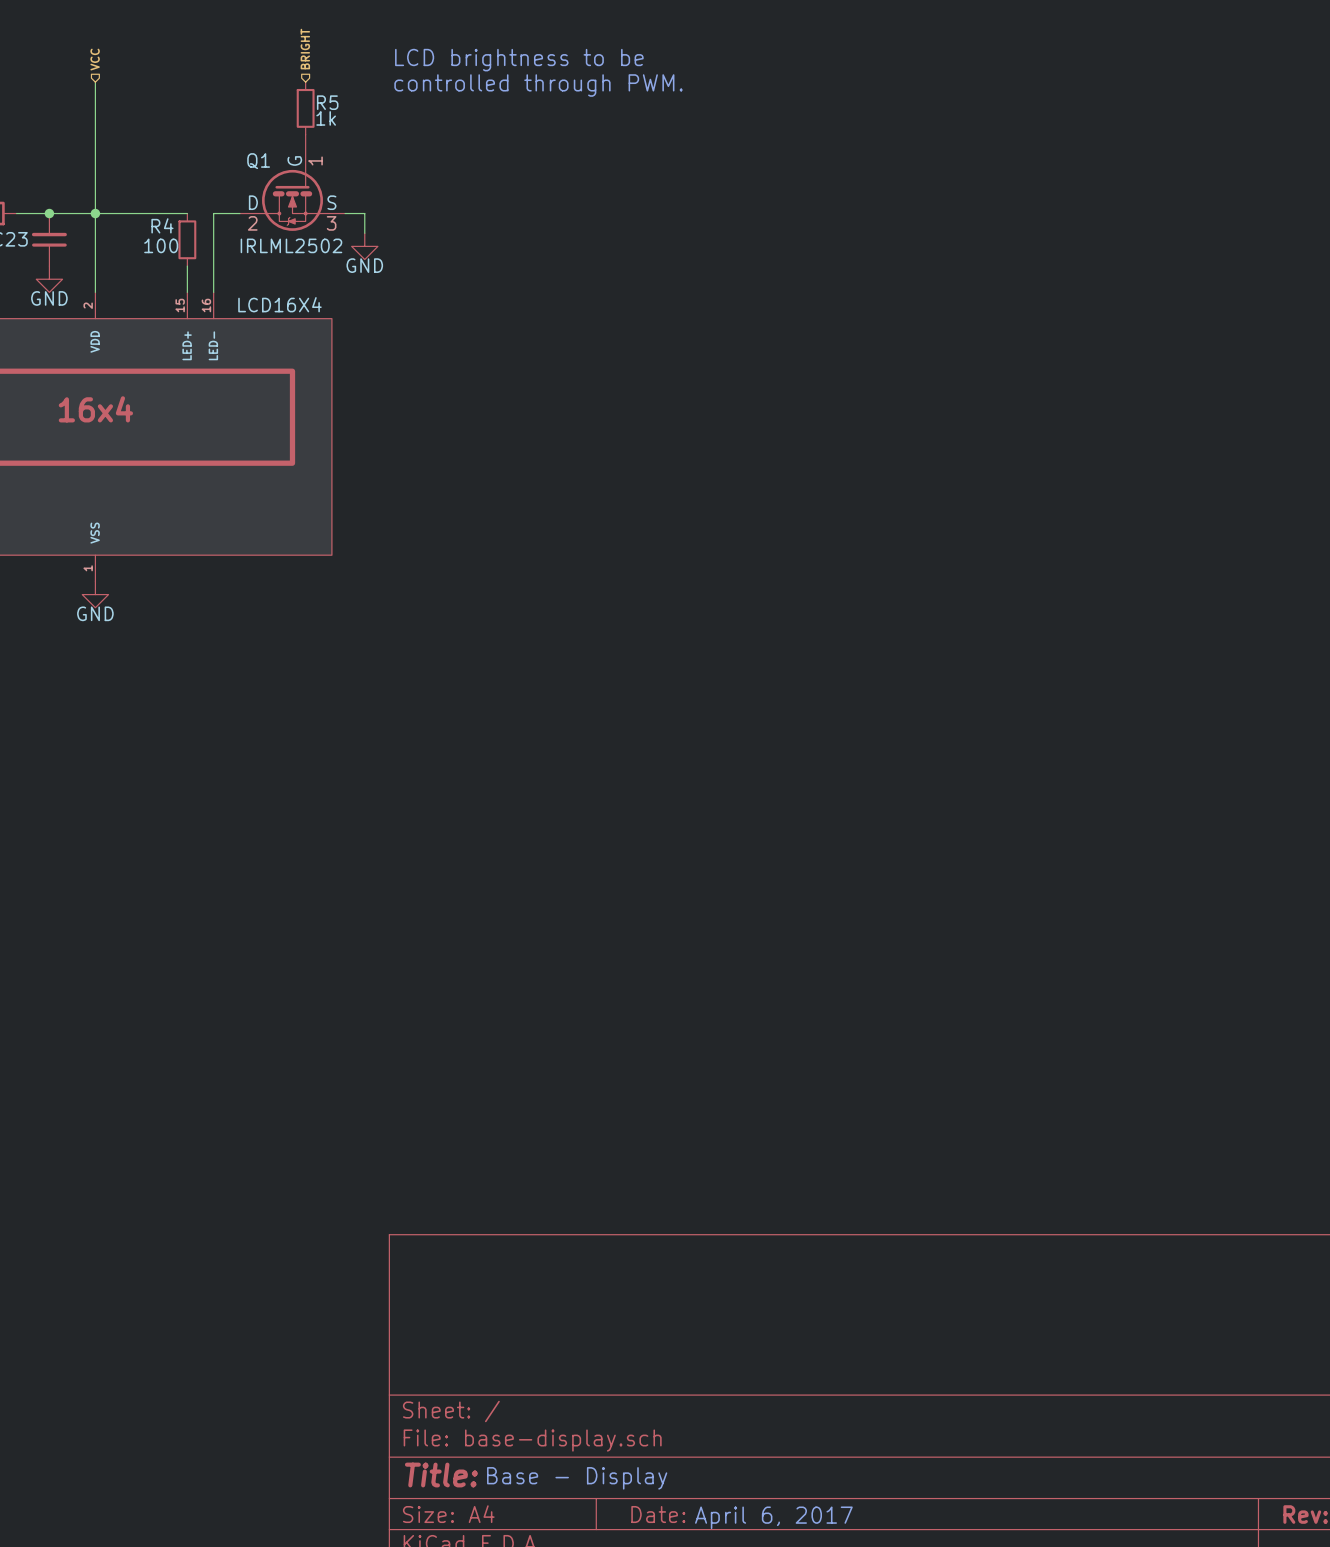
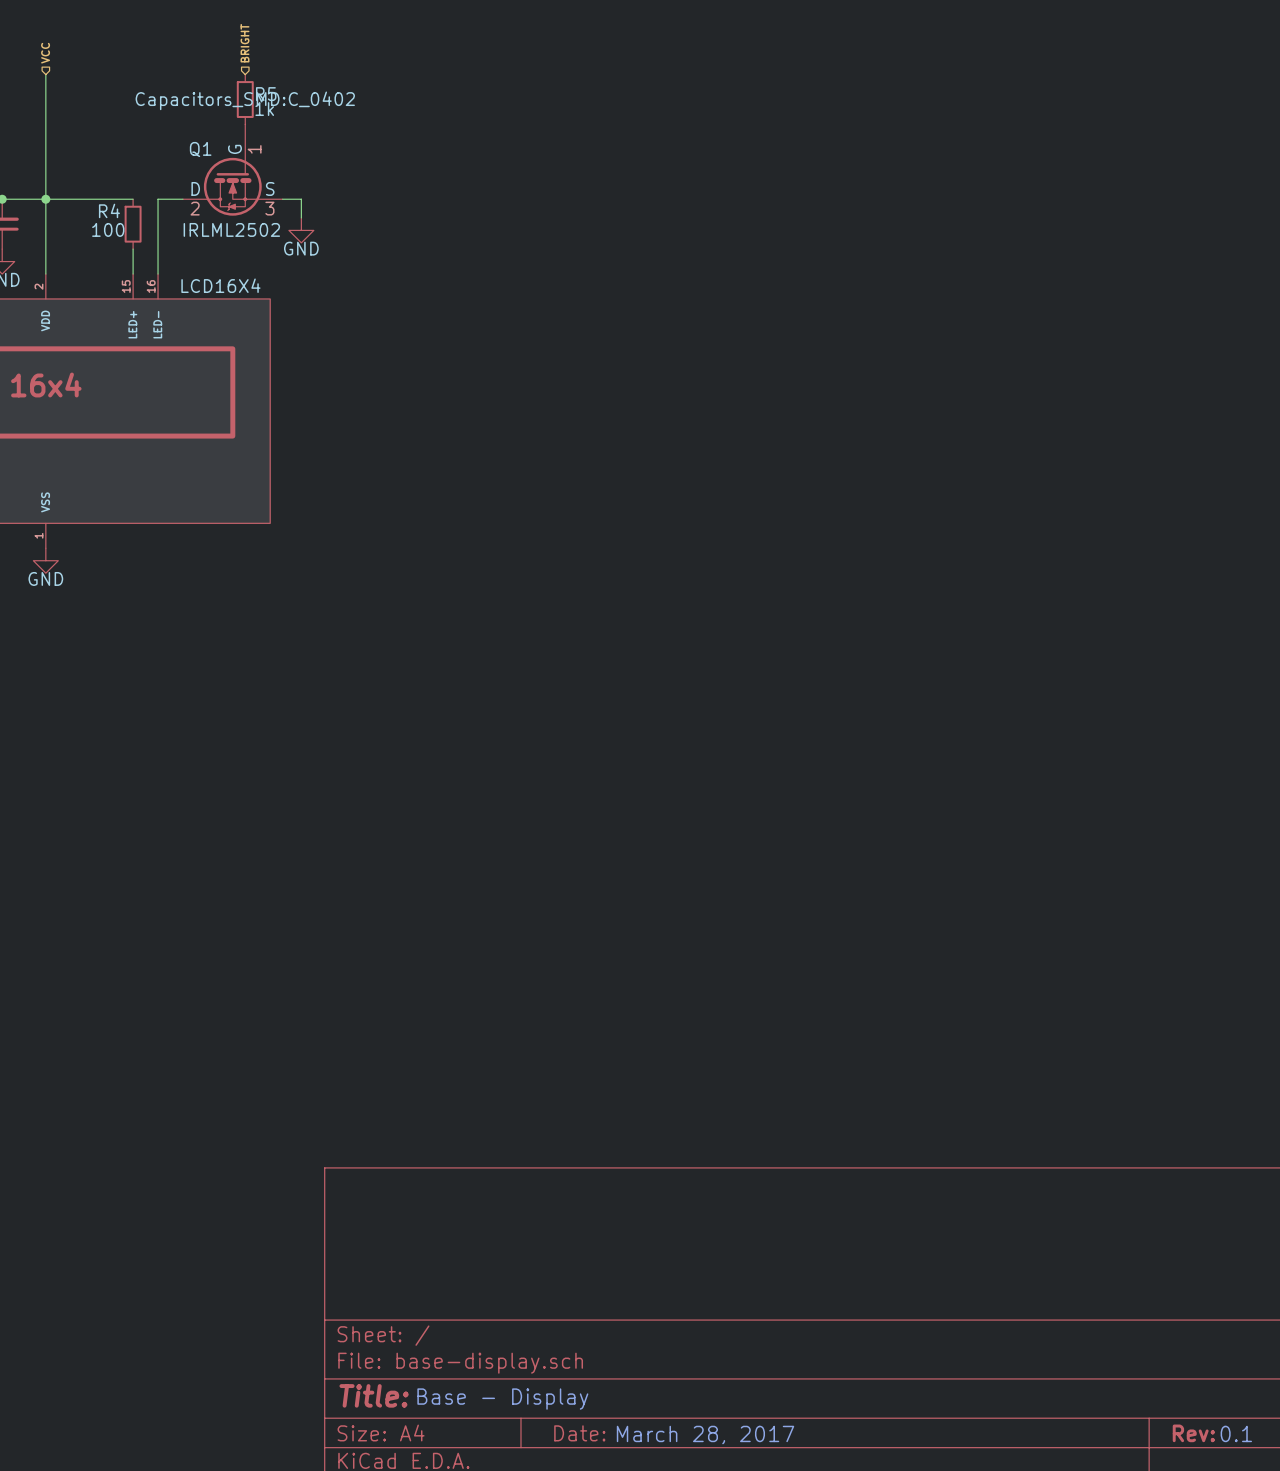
text: LCD brightness to be (519, 60) -> none
text: controlled through PWM. (538, 85) -> none
R5 text: none -> Capacitors_SMD:C_0402 (245, 100)
text: April 6, 2017 (773, 1517) -> March 28, 2017 (705, 1435)

